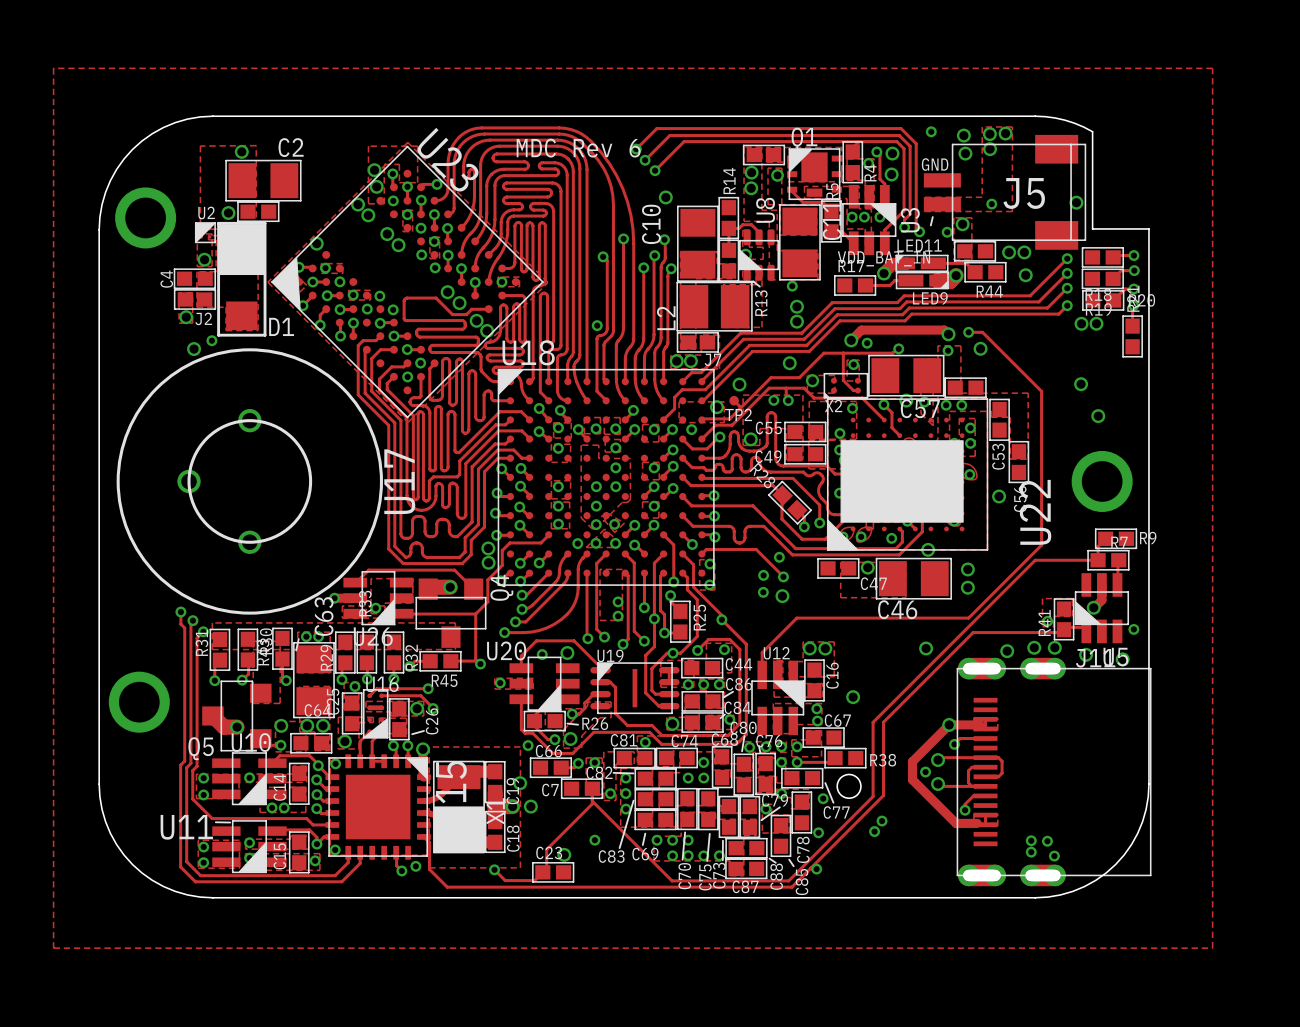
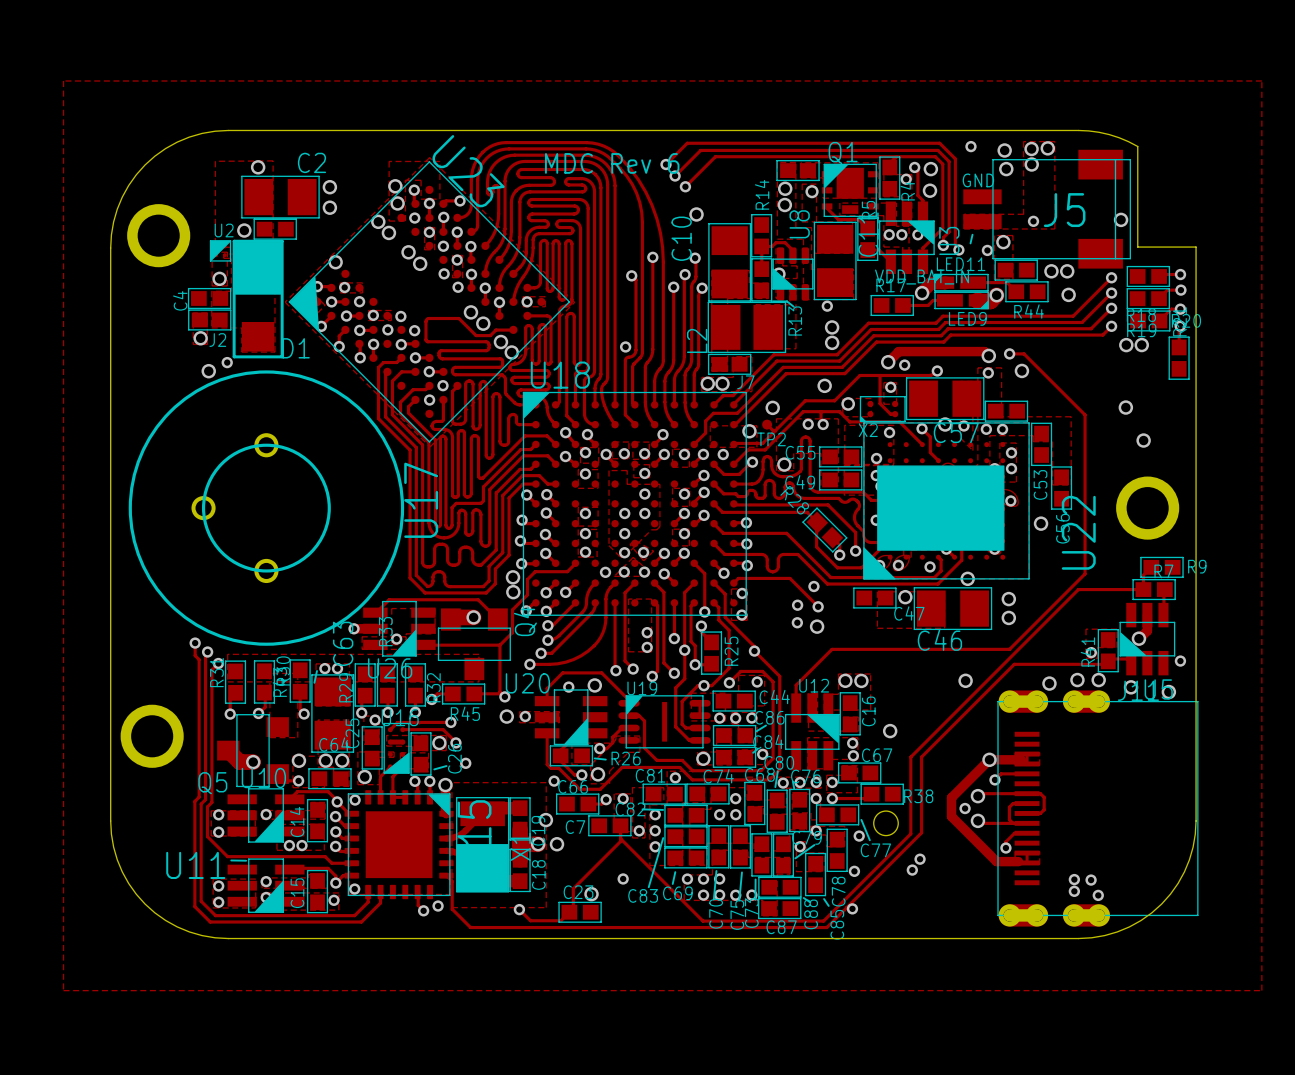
via: none -> (329, 187)
via: none -> (329, 207)
via: none -> (506, 716)
via: none -> (465, 763)

